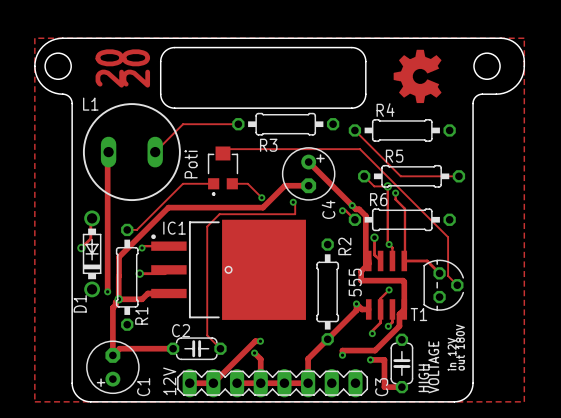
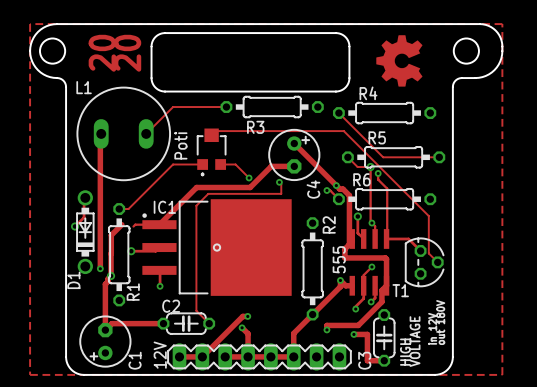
track: (207, 207) (168, 207) (129, 246) -> (196, 187) (159, 224)
via: (142, 248) -> none
track: (168, 293) (147, 293) (142, 299) (118, 299) -> (159, 270) (160, 286)
via: none -> (160, 286)

